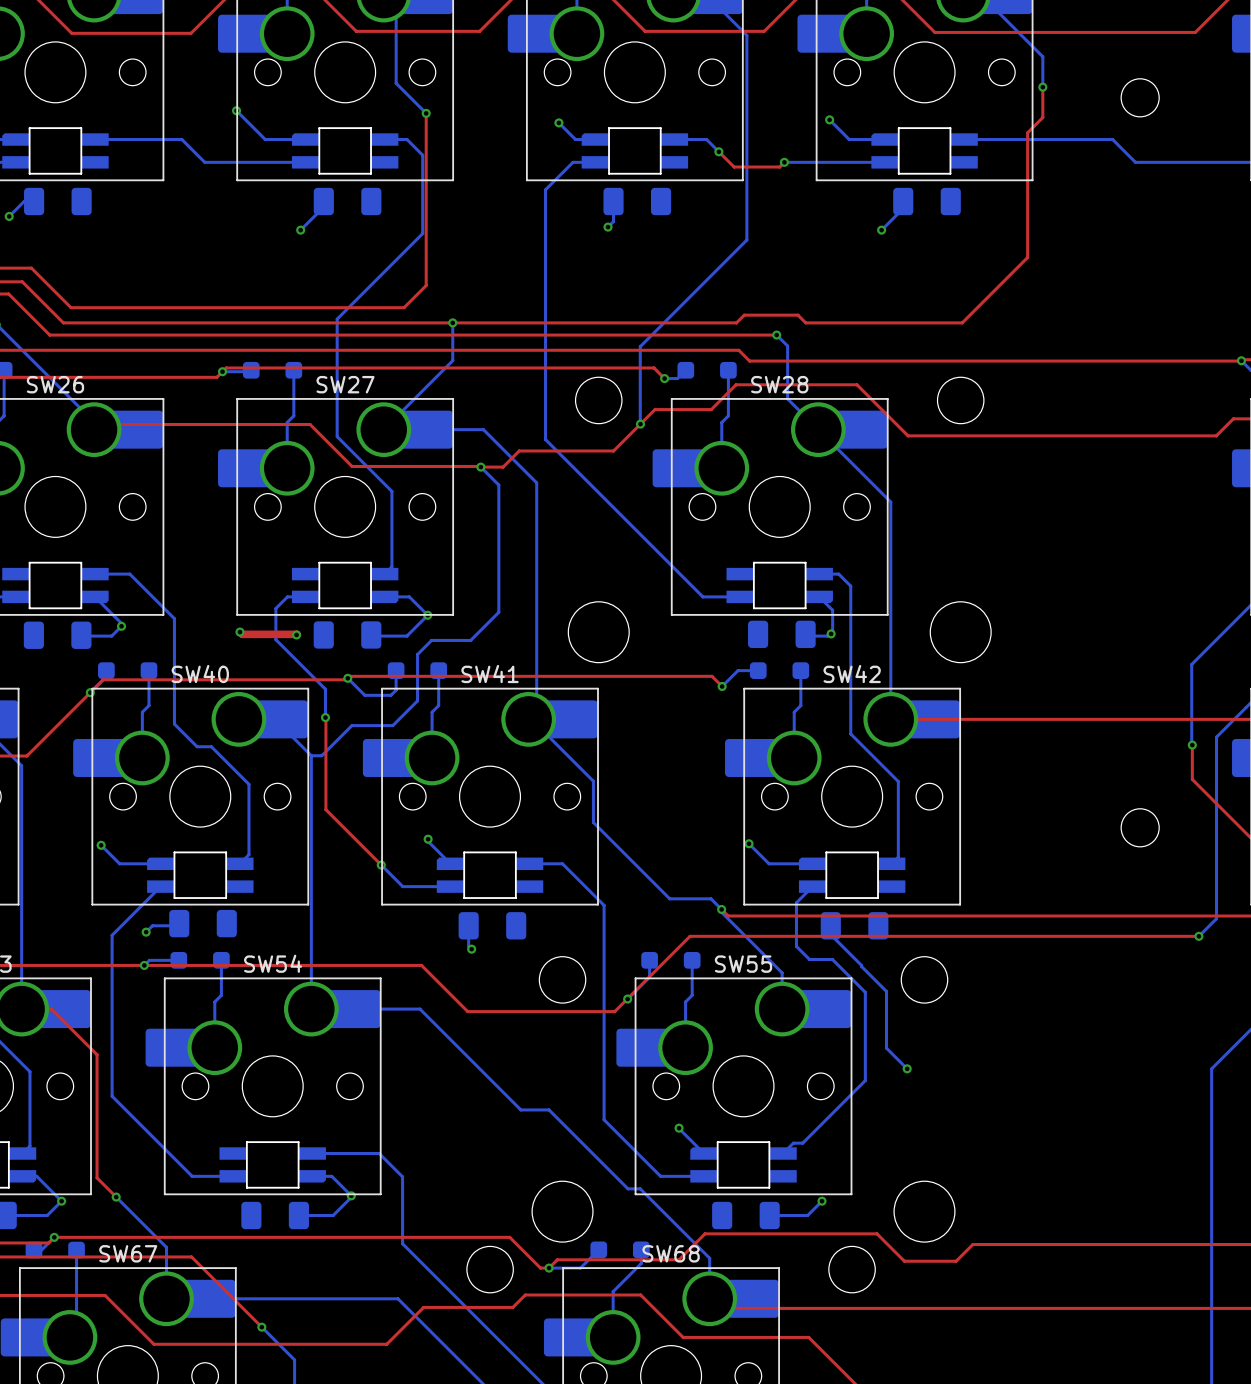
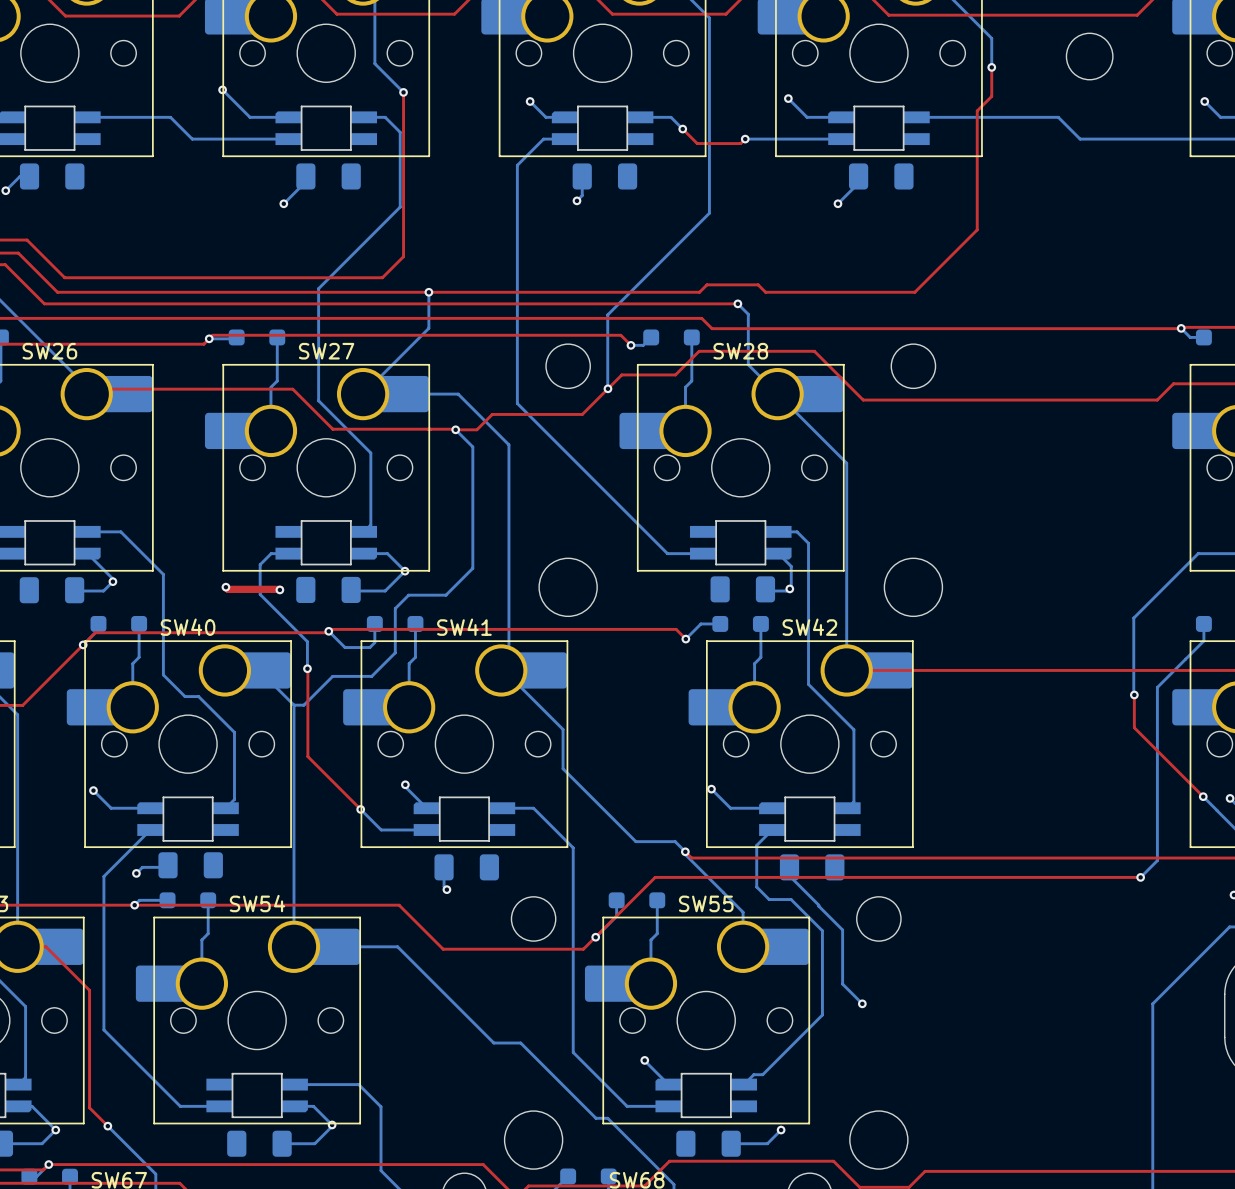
round board edge: none -> [1066, 32, 1114, 81]
round board edge: [1120, 78, 1160, 118] -> none
round board edge: [1120, 808, 1160, 848] -> none

